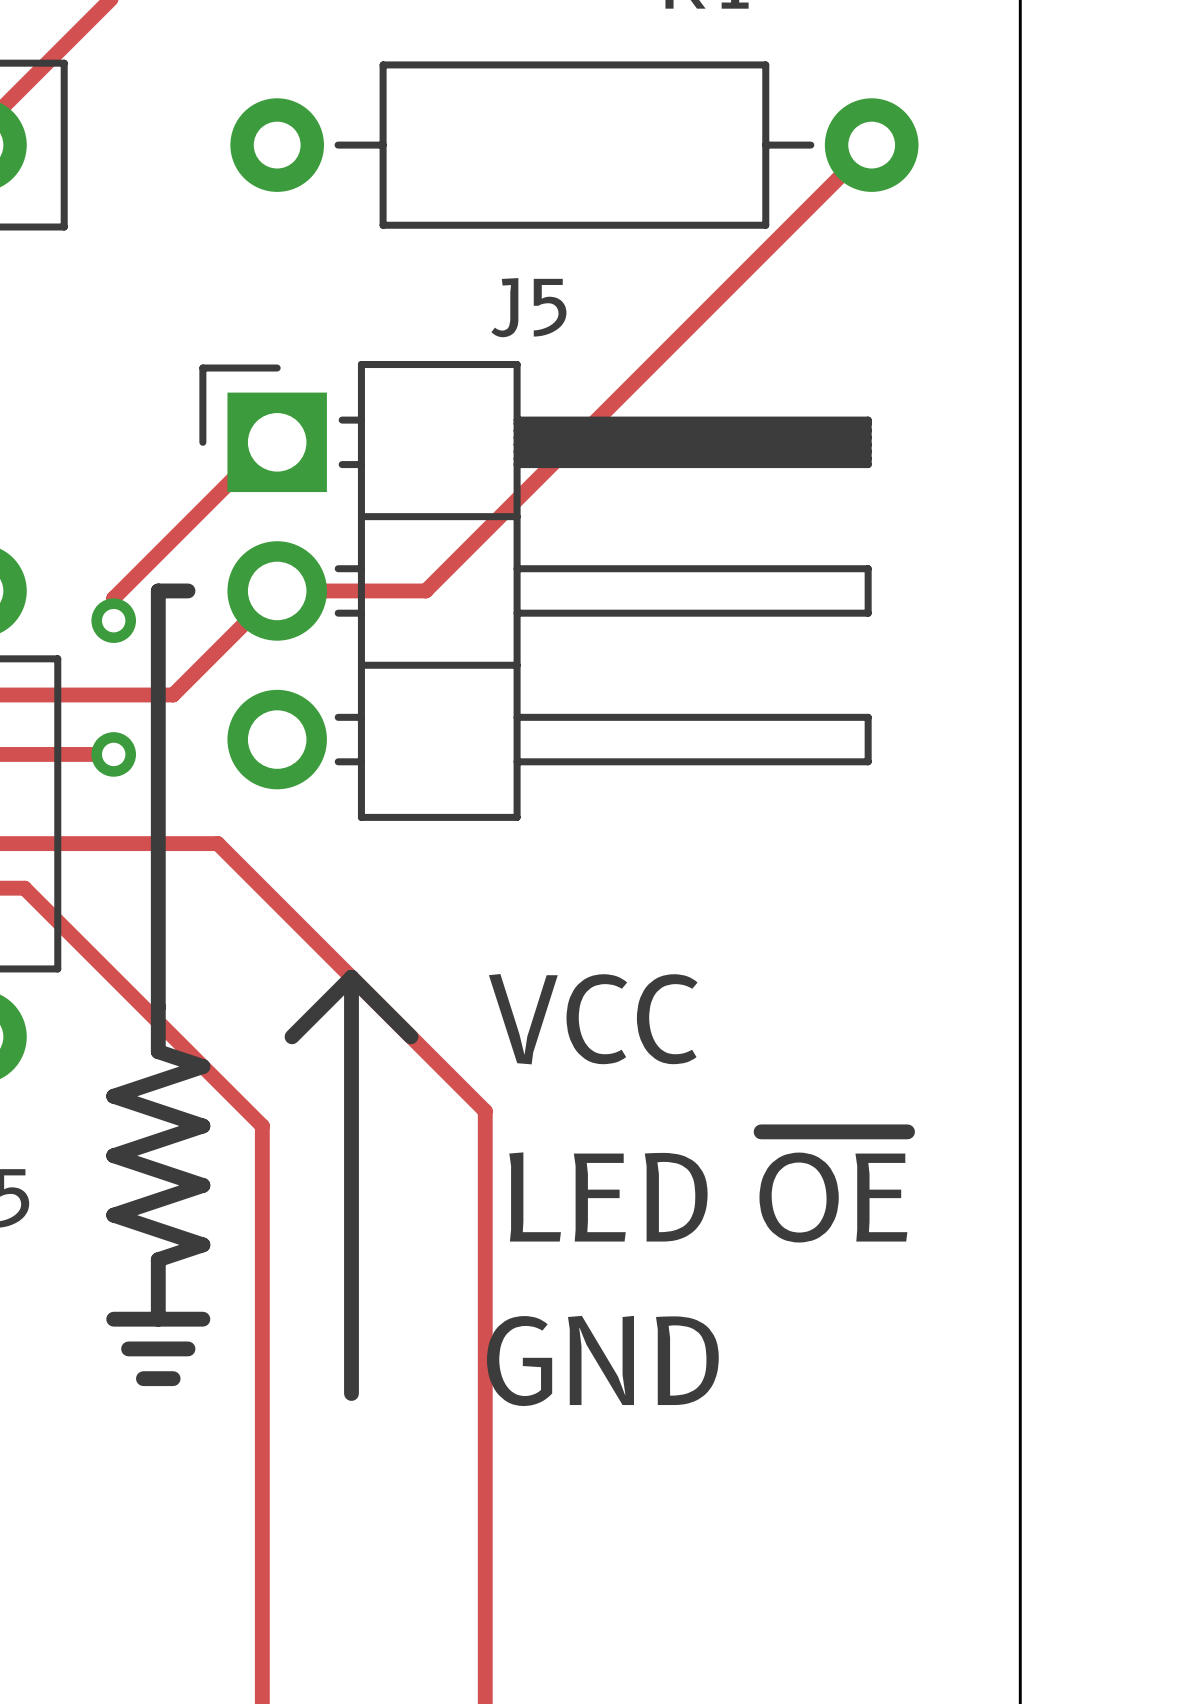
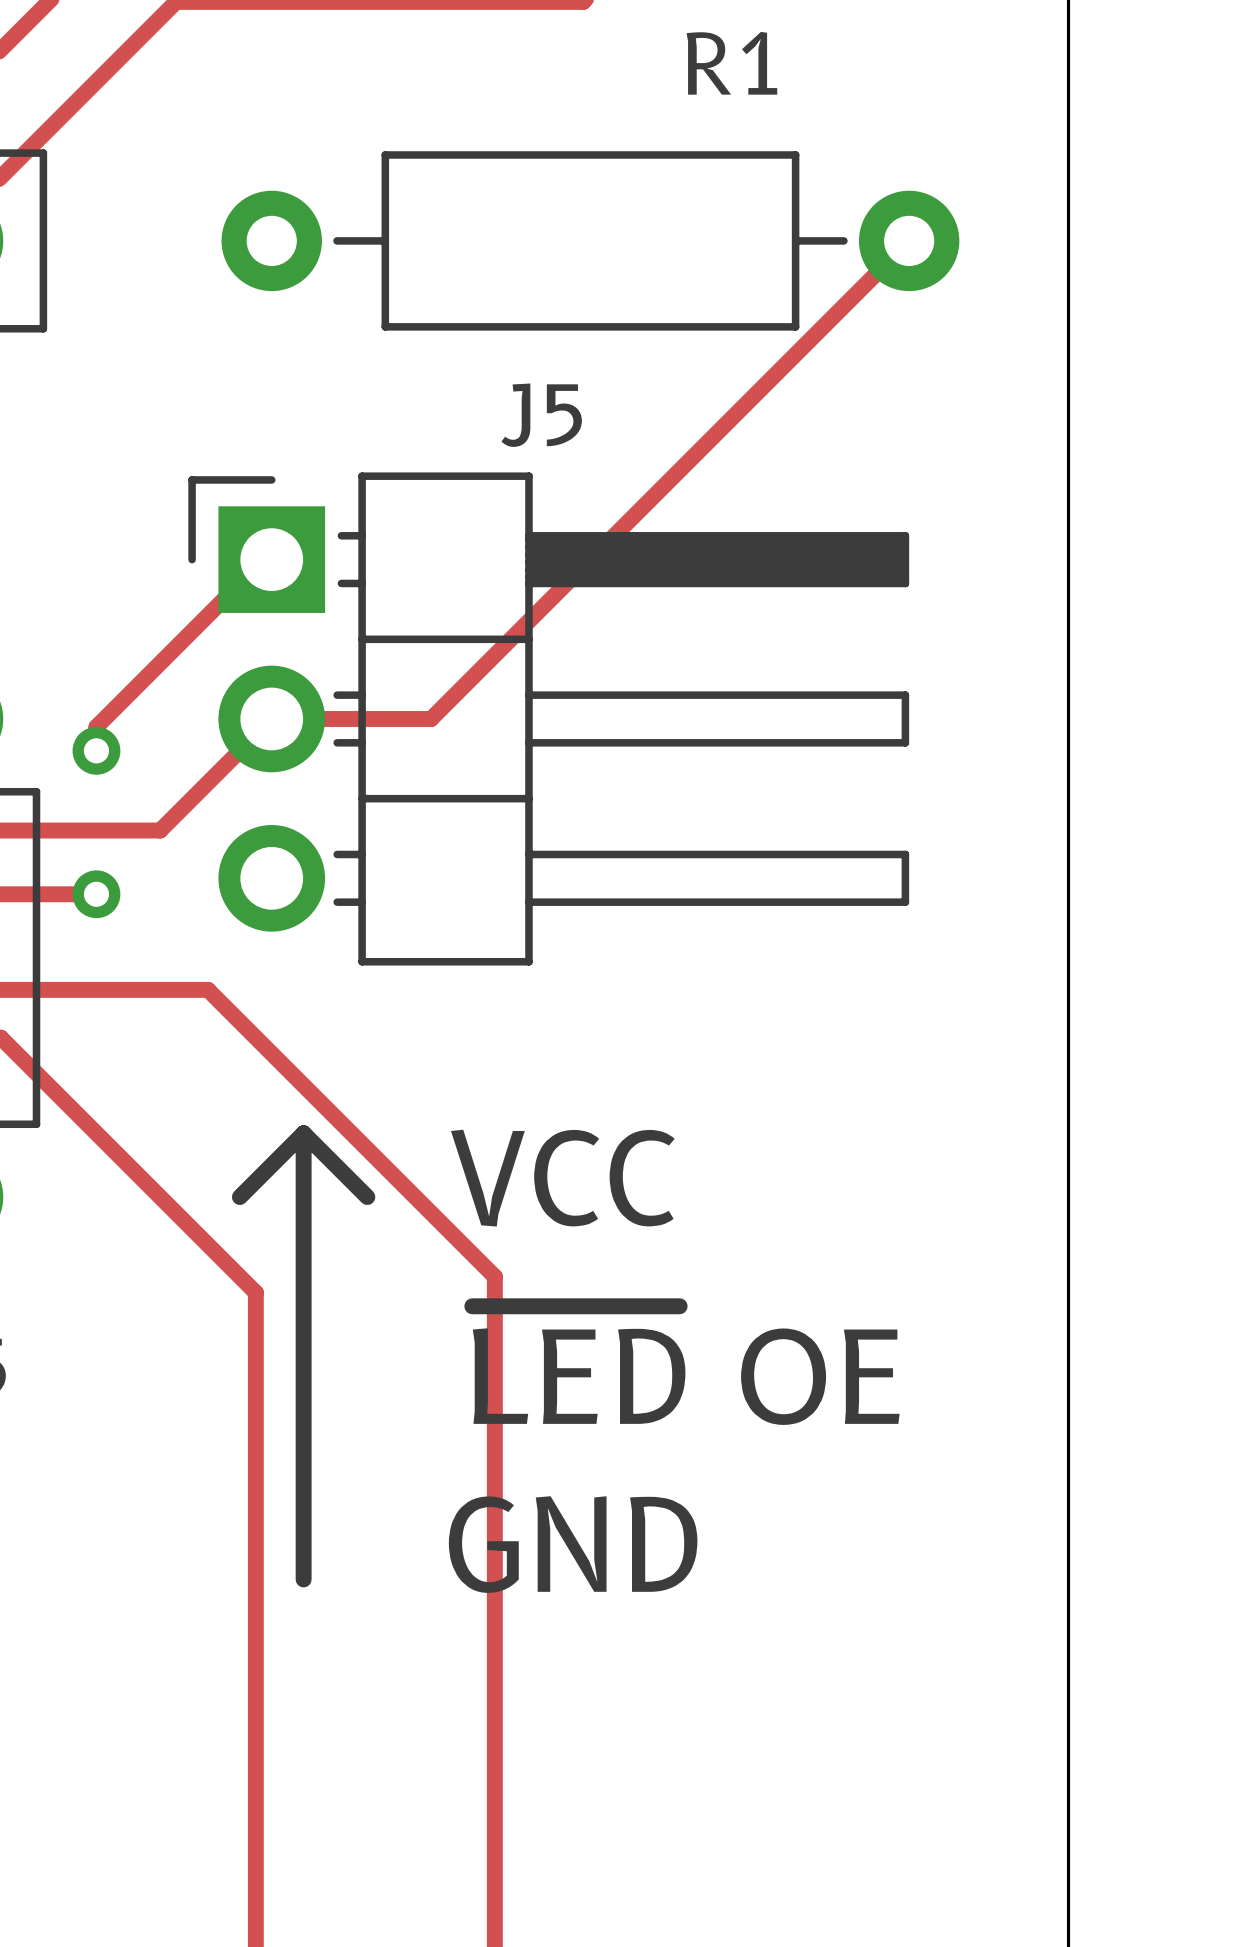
line: (188, 590) (158, 590) (158, 1051) (202, 1066) (113, 1096) (202, 1125) (113, 1155) (202, 1185) (113, 1215) (202, 1244) (158, 1259) (158, 1319) -> none
line: (351, 977) (410, 1036) -> (303, 1133) (367, 1197)
line: (351, 977) (292, 1036) -> (303, 1133) (239, 1197)
line: (351, 977) (351, 1393) -> (303, 1133) (303, 1579)
text position: VCC (593, 1019) -> VCC (562, 1178)
text: LED ~{OE} (708, 1187) -> ~{LED} OE (685, 1365)
line: (113, 1319) (202, 1319) -> none
line: (128, 1348) (188, 1348) -> none
text position: GND (602, 1360) -> GND (573, 1544)
line: (143, 1378) (173, 1378) -> none

